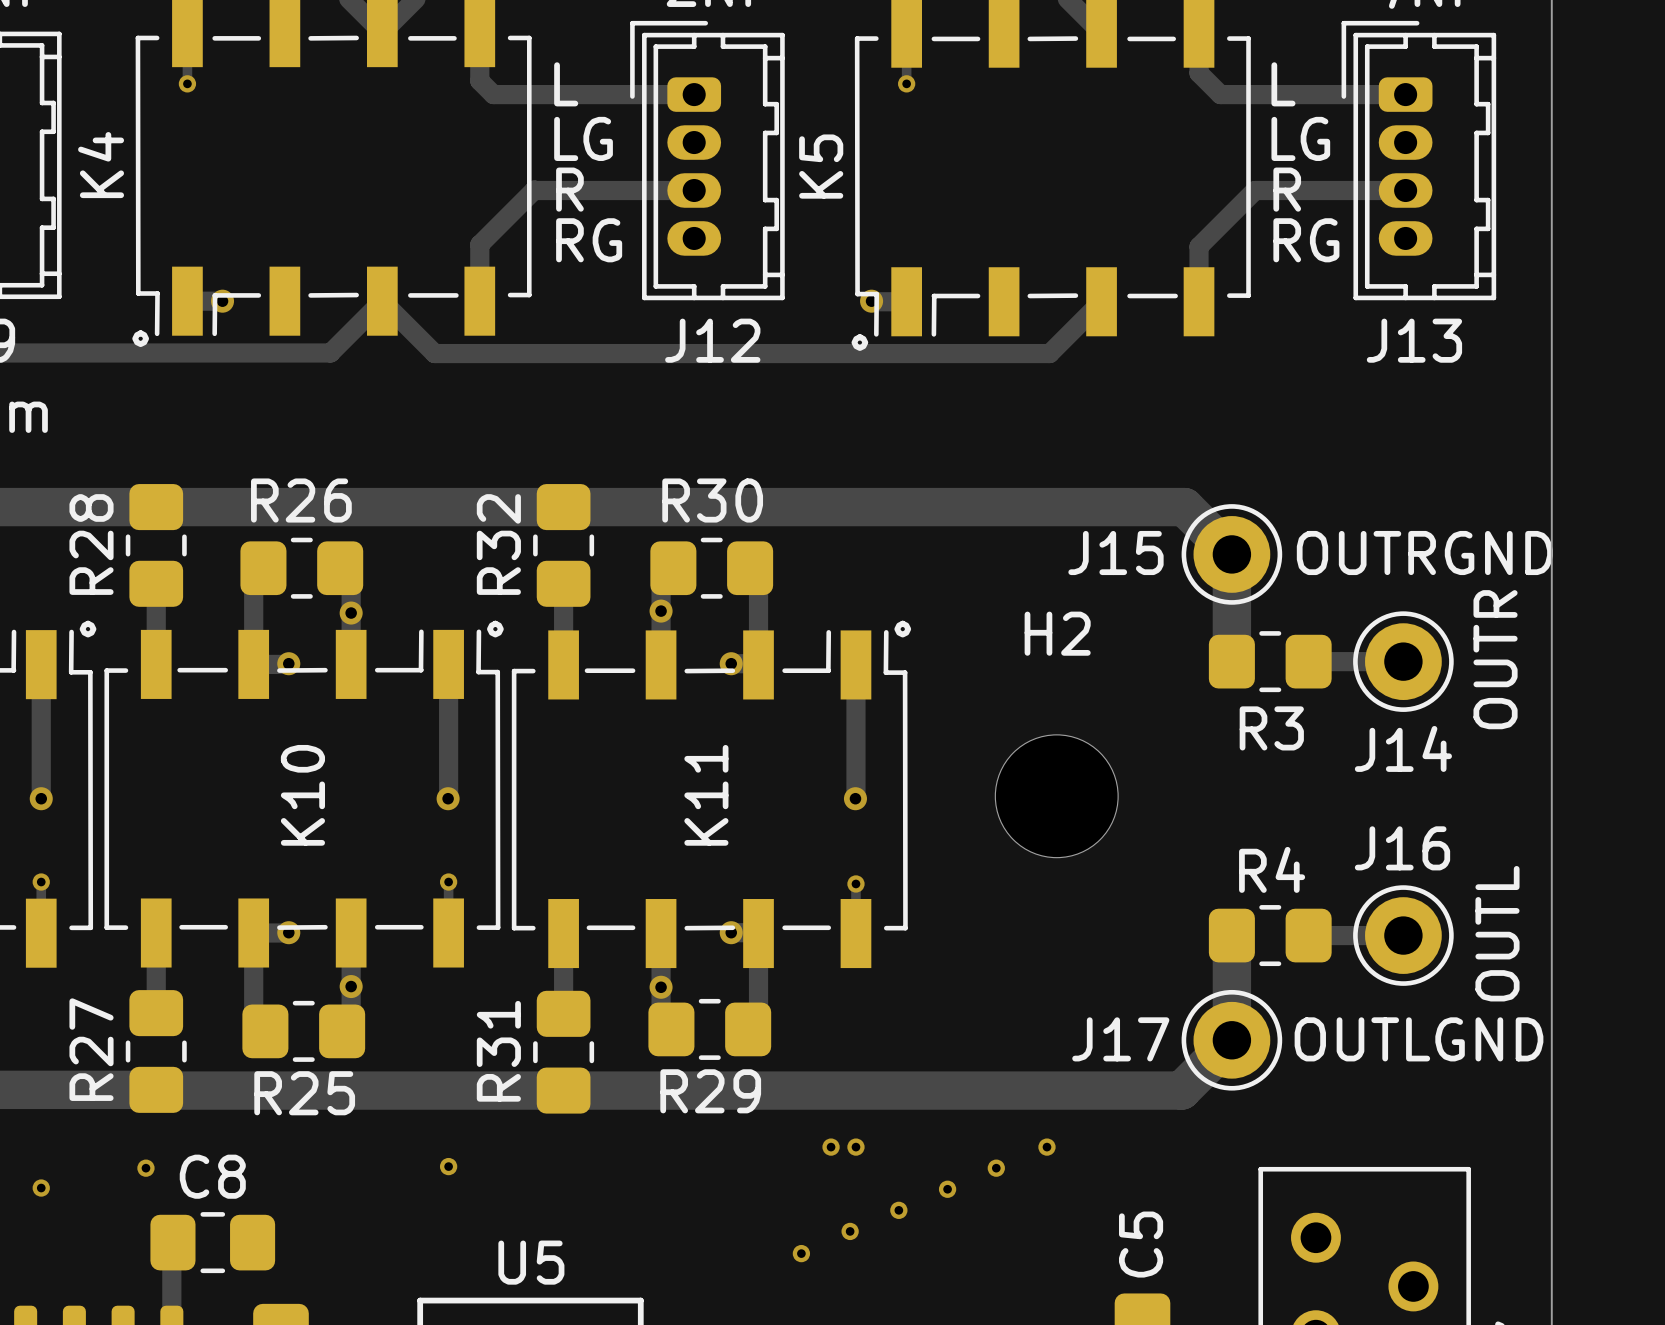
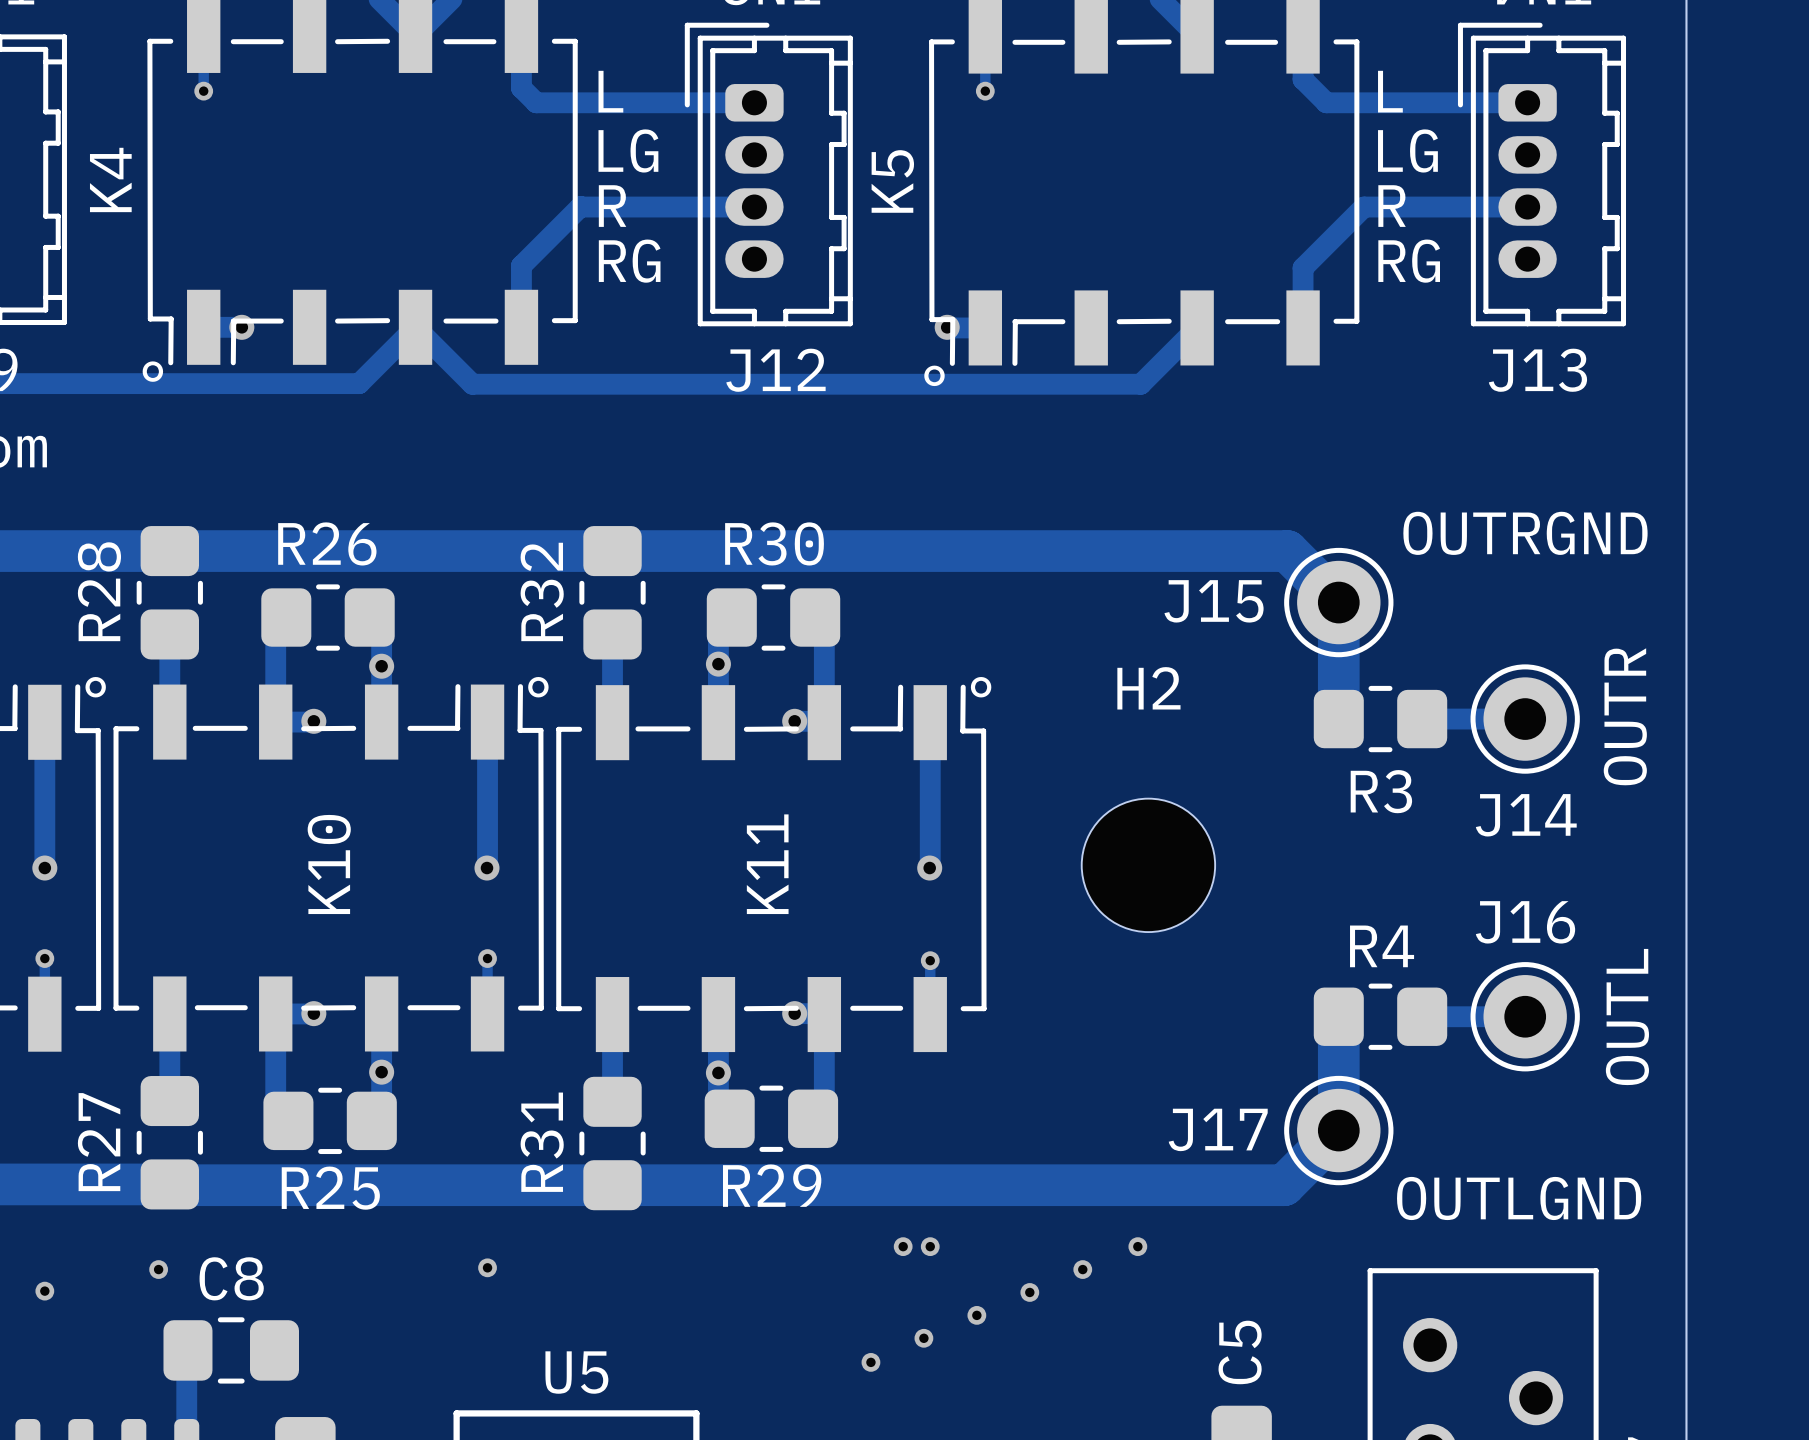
text position: OUTRGND (1424, 553) -> OUTRGND (1525, 533)
text position: OUTLGND (1419, 1039) -> OUTLGND (1519, 1198)

